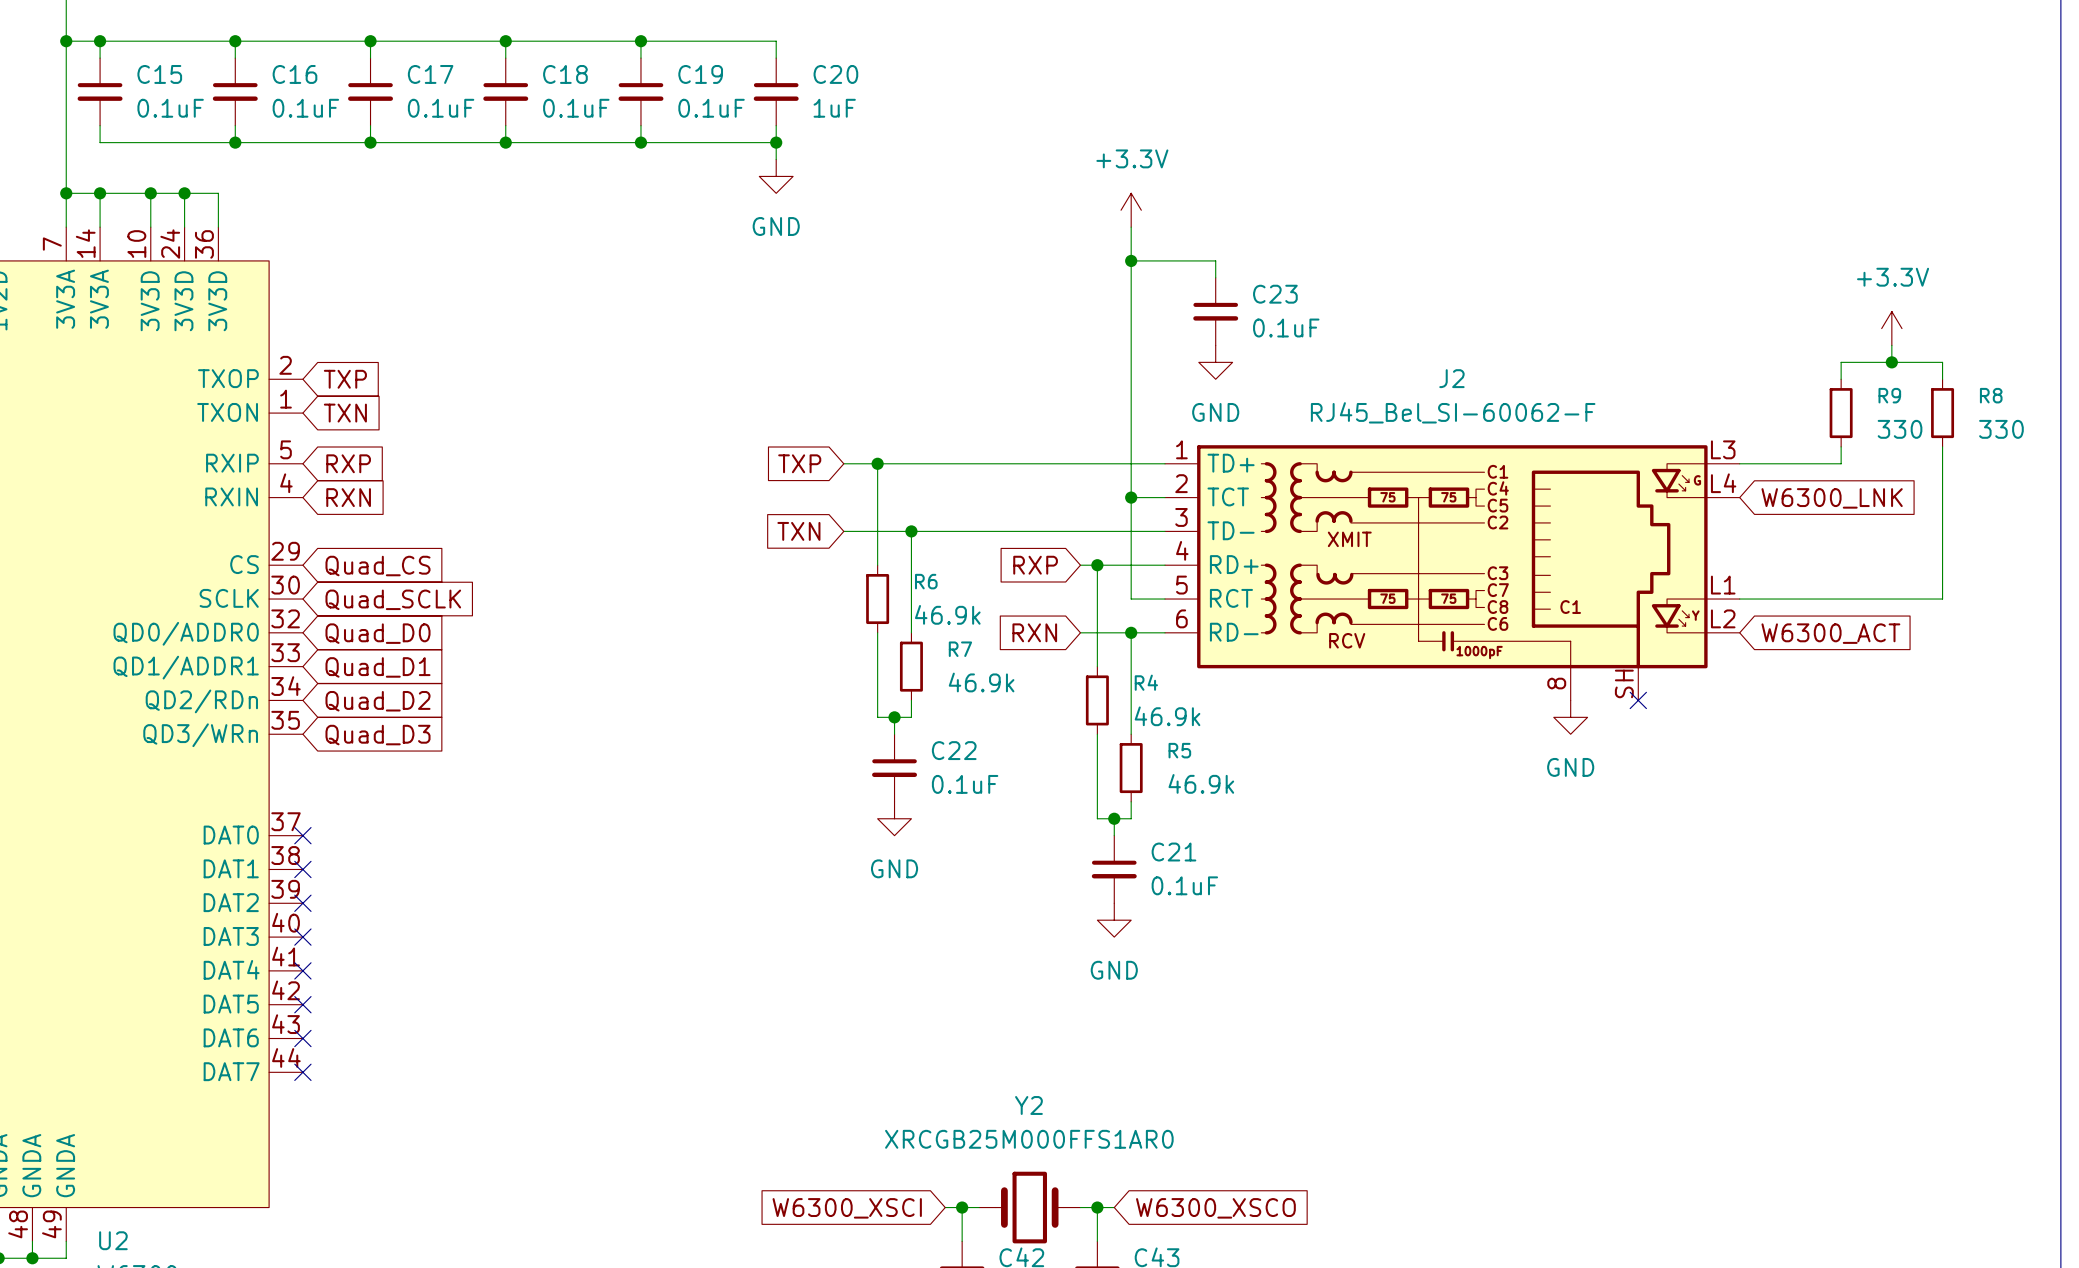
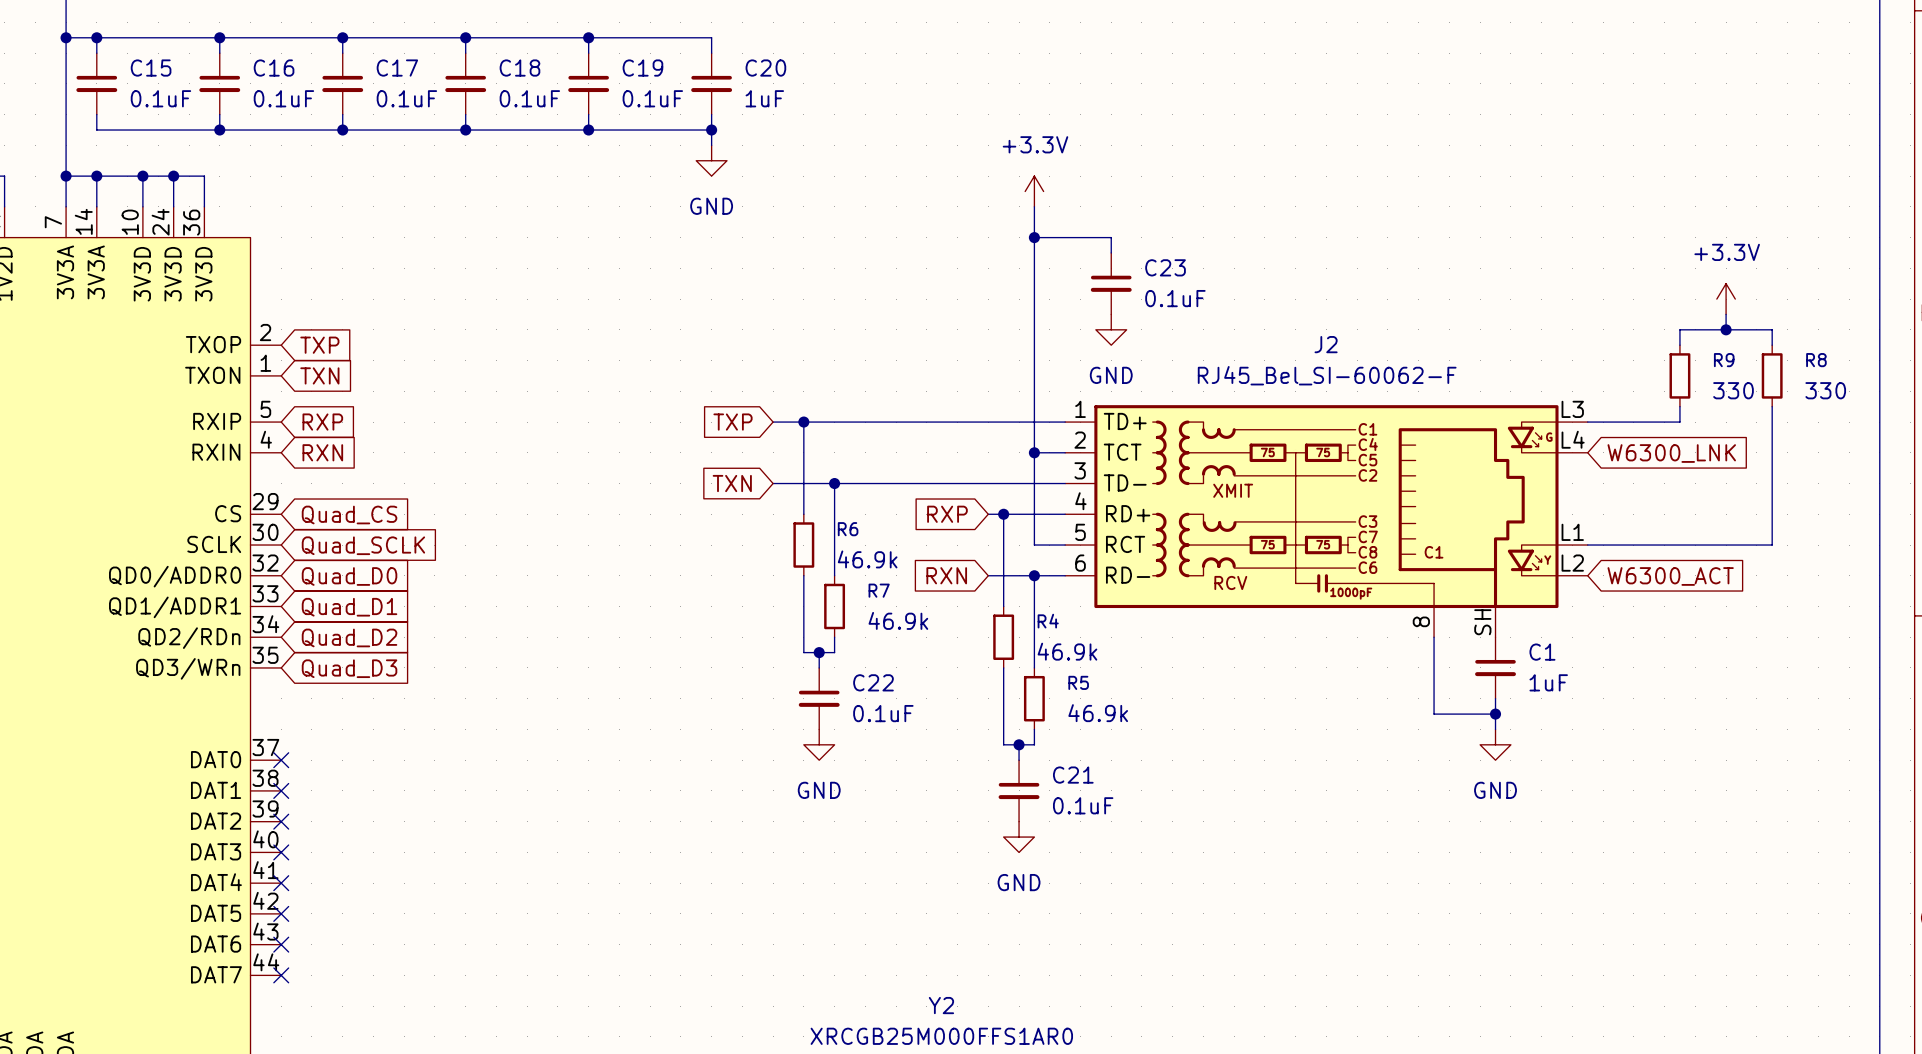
wire: none -> (1434, 637) (1434, 714) (1495, 714)
no-connect mark: (1638, 700) -> none
power symbol position: GND (1570, 717) -> GND (1495, 744)
C1: none -> 1uF (1495, 667)
wire: none -> (1495, 698) (1495, 729)
junction: none -> (1495, 714)

